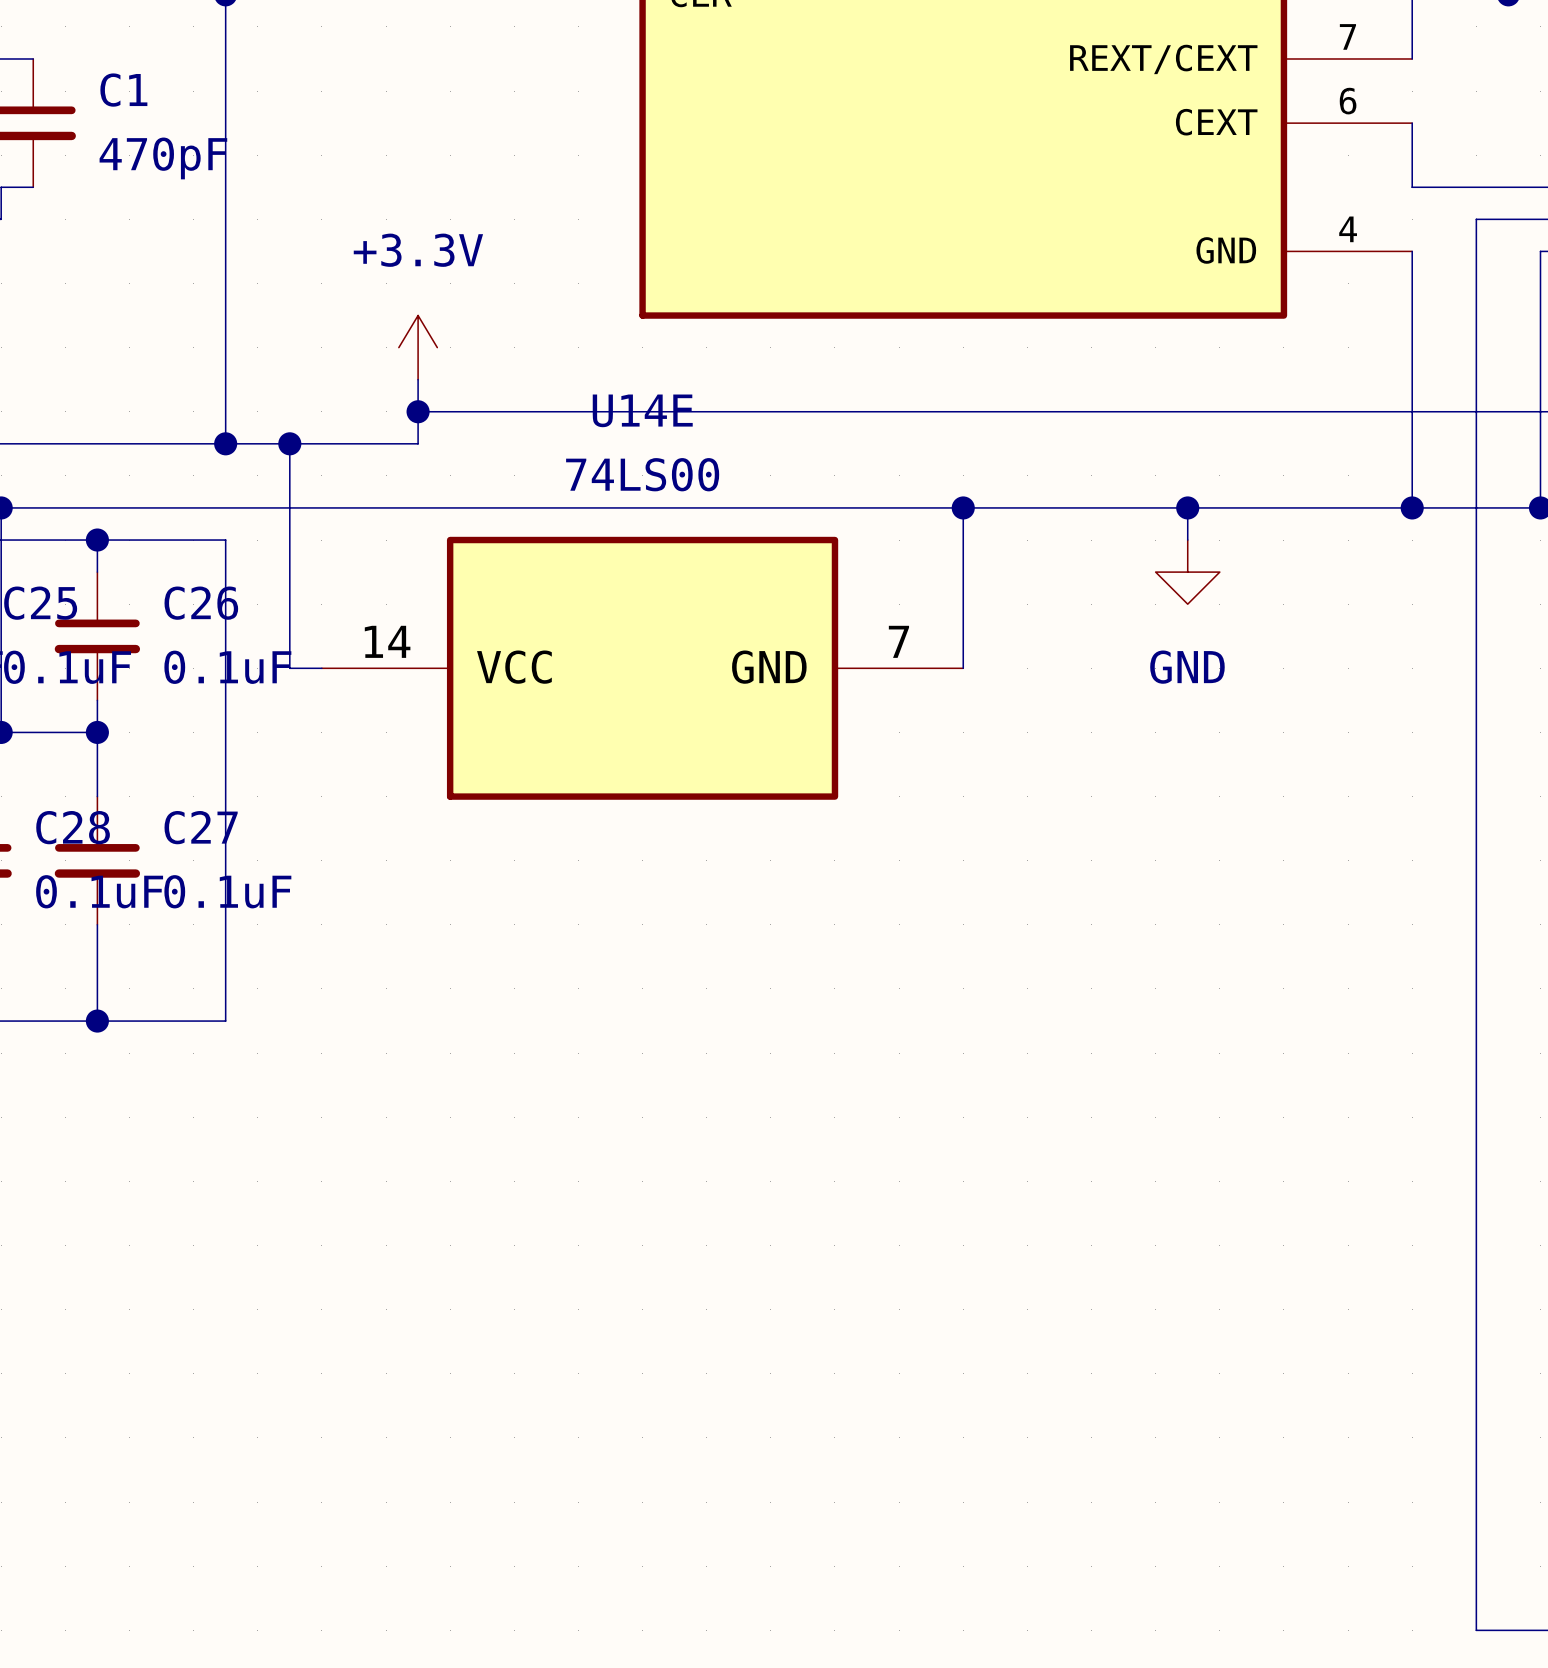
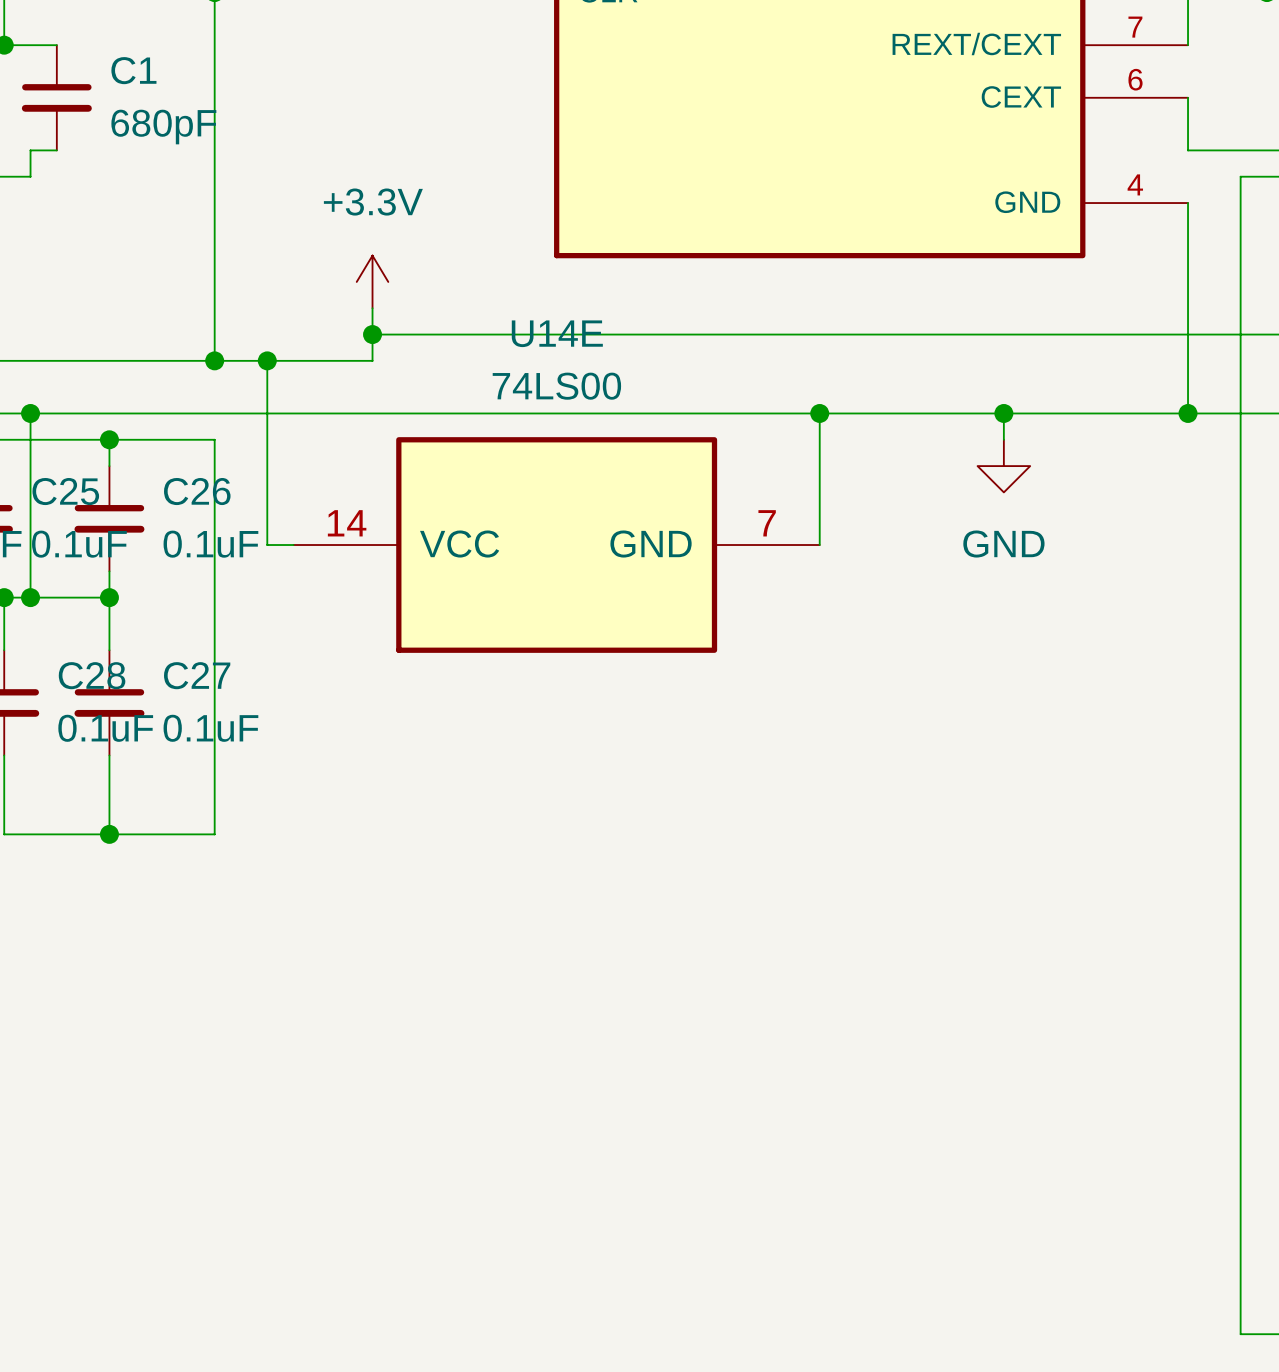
C1 value: 470pF (163, 158) -> 680pF (163, 127)

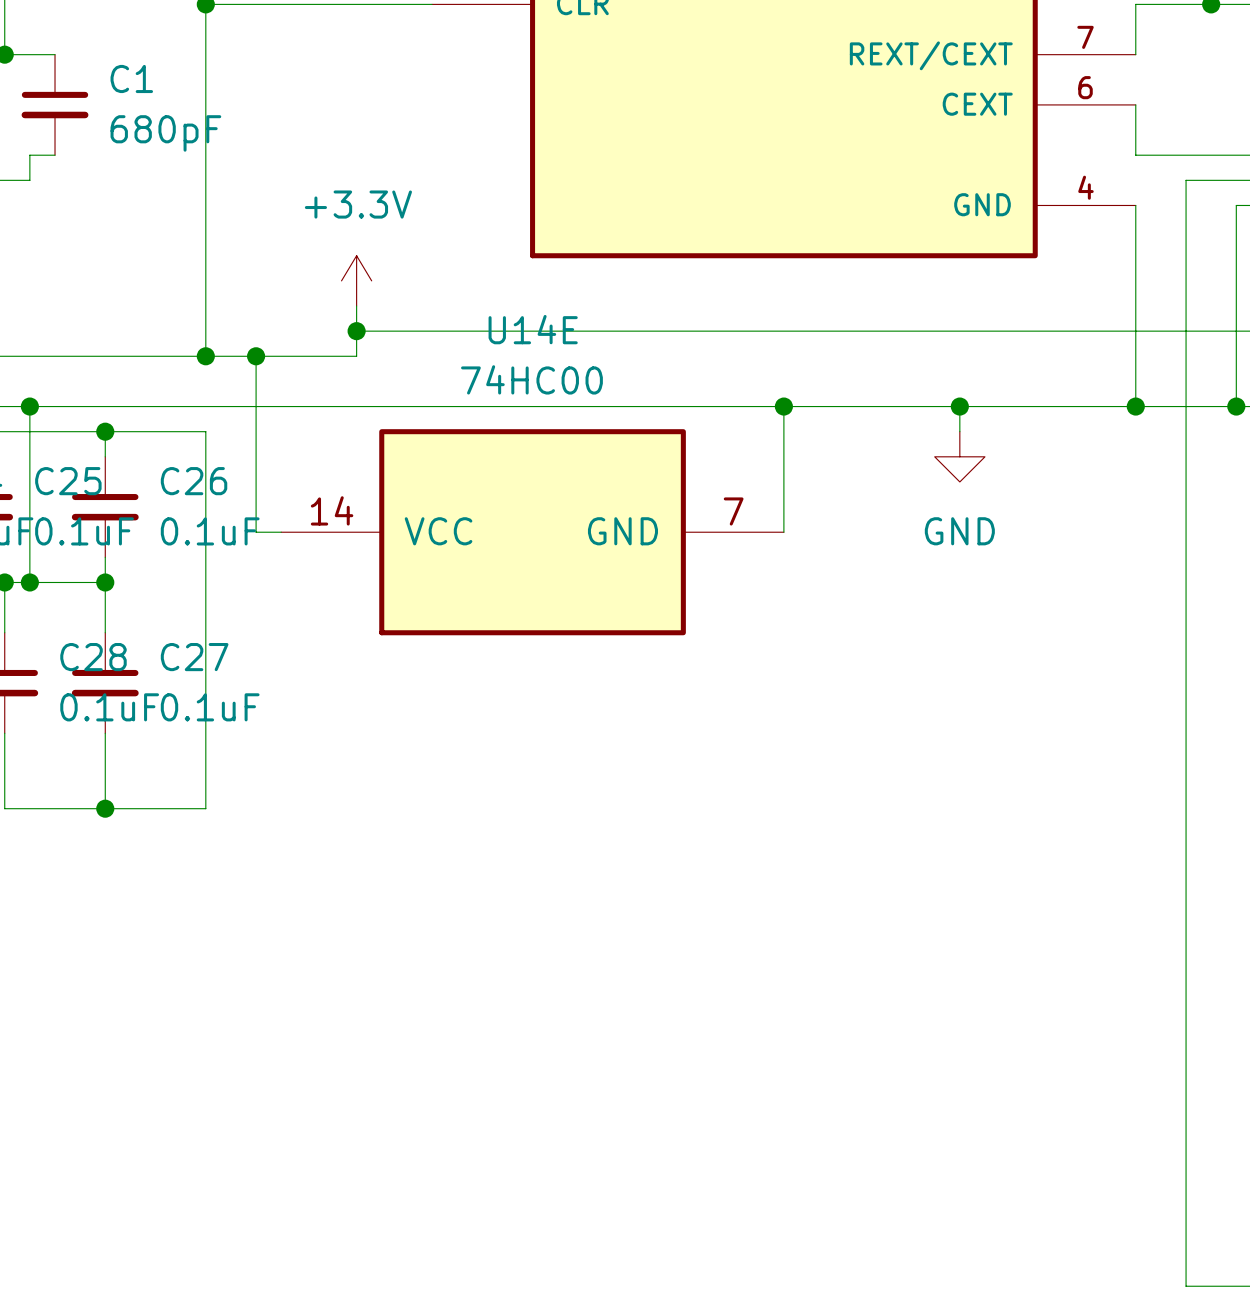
U14E value: 74LS00 (556, 386) -> 74HC00 (531, 379)

